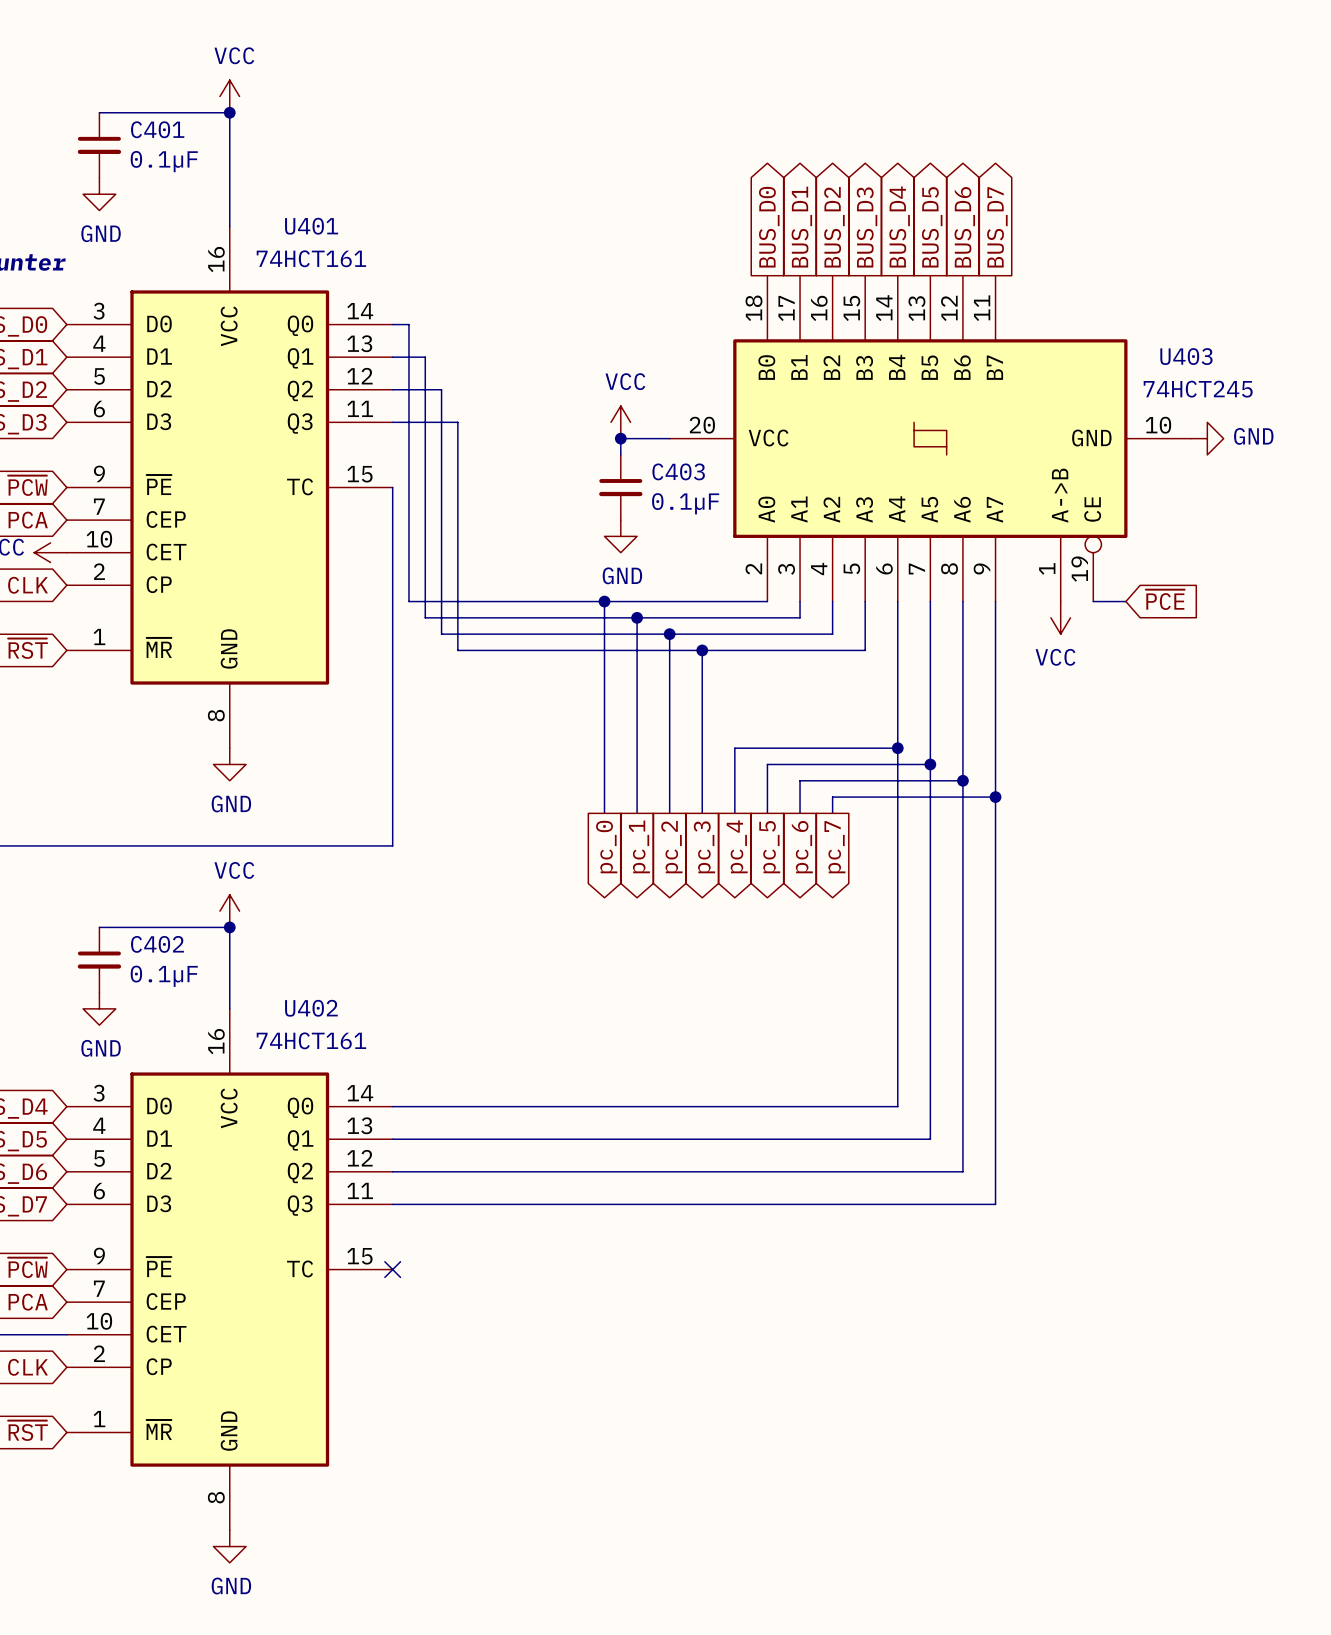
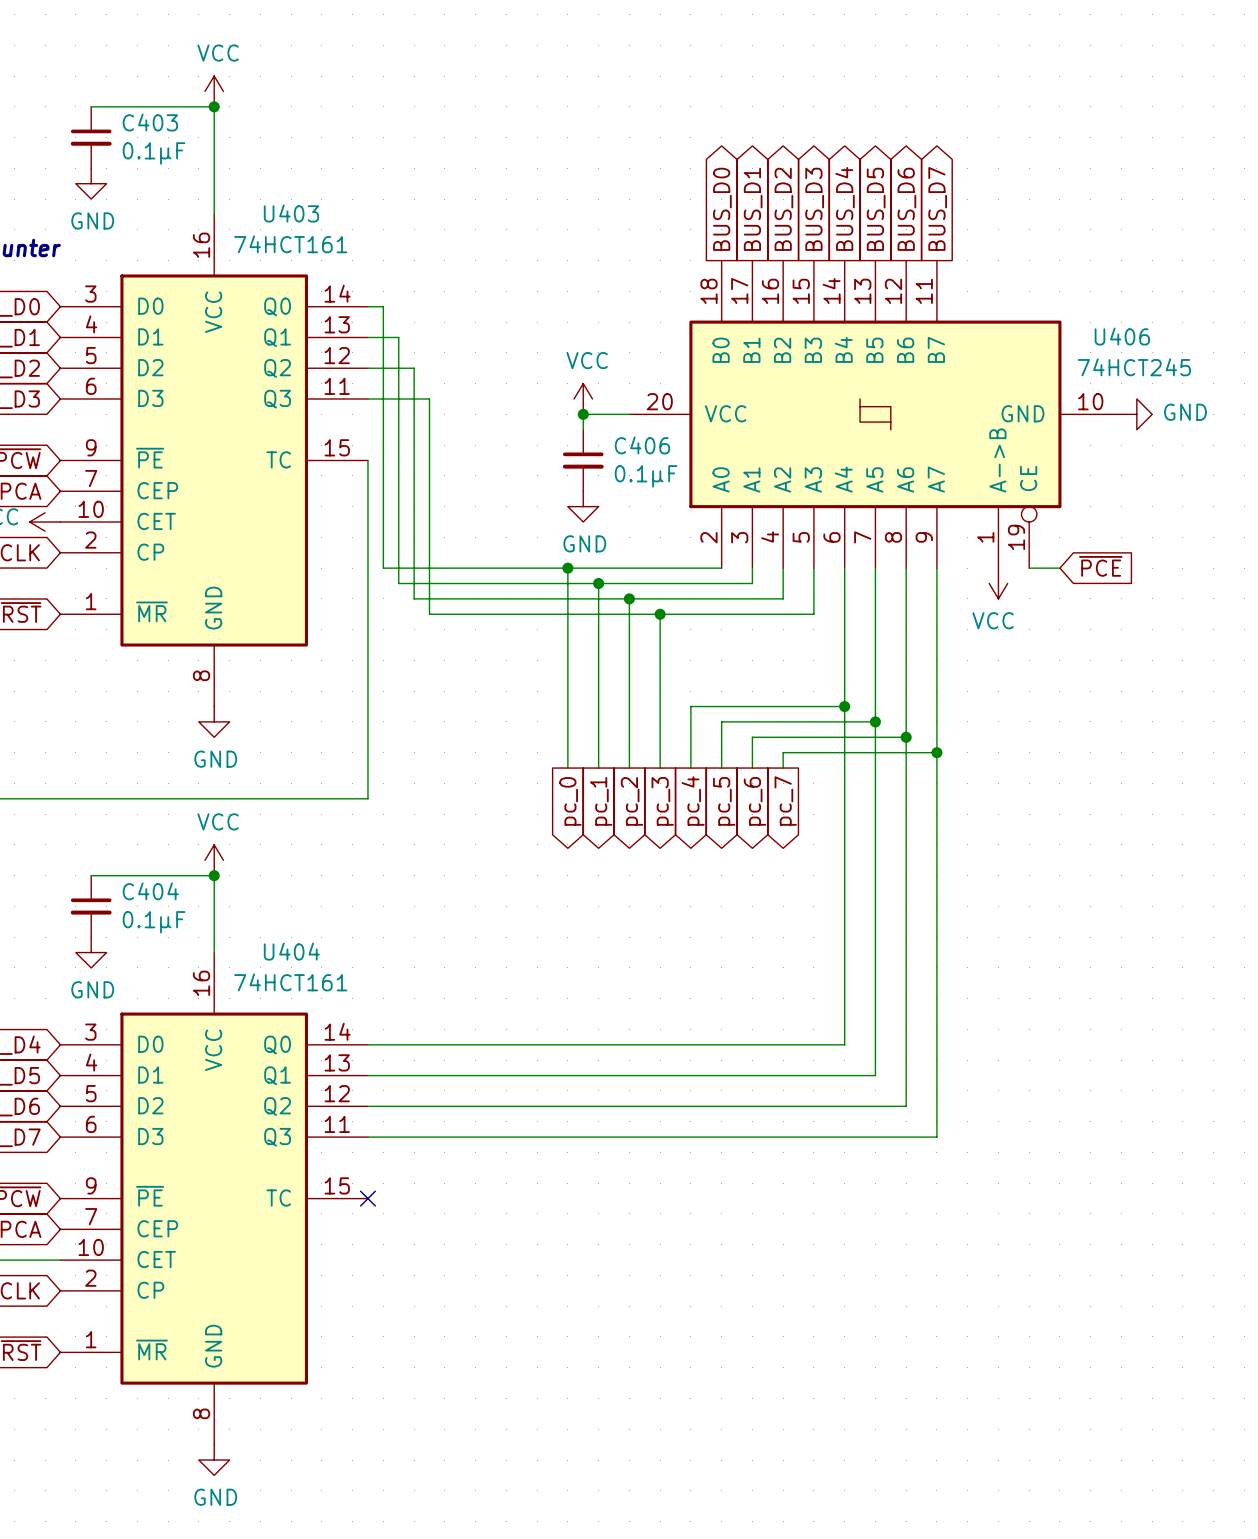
C401 name: C401 (157, 129) -> C403 (150, 122)
U401 name: U401 (311, 226) -> U403 (291, 213)
U403 name: U403 (1186, 356) -> U406 (1122, 336)
C403 name: C403 (678, 471) -> C406 (642, 445)
C402 name: C402 (157, 944) -> C404 (150, 891)
U402 name: U402 (311, 1008) -> U404 (291, 951)

